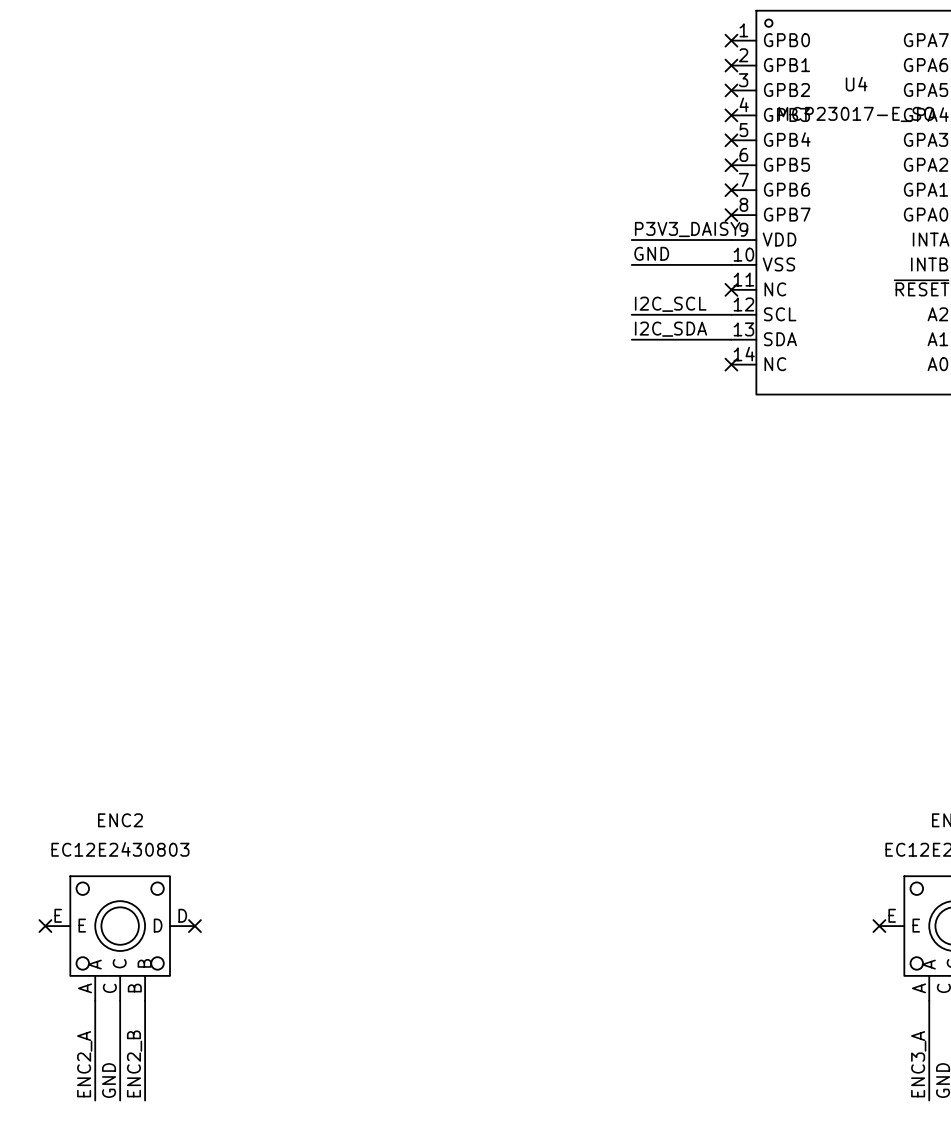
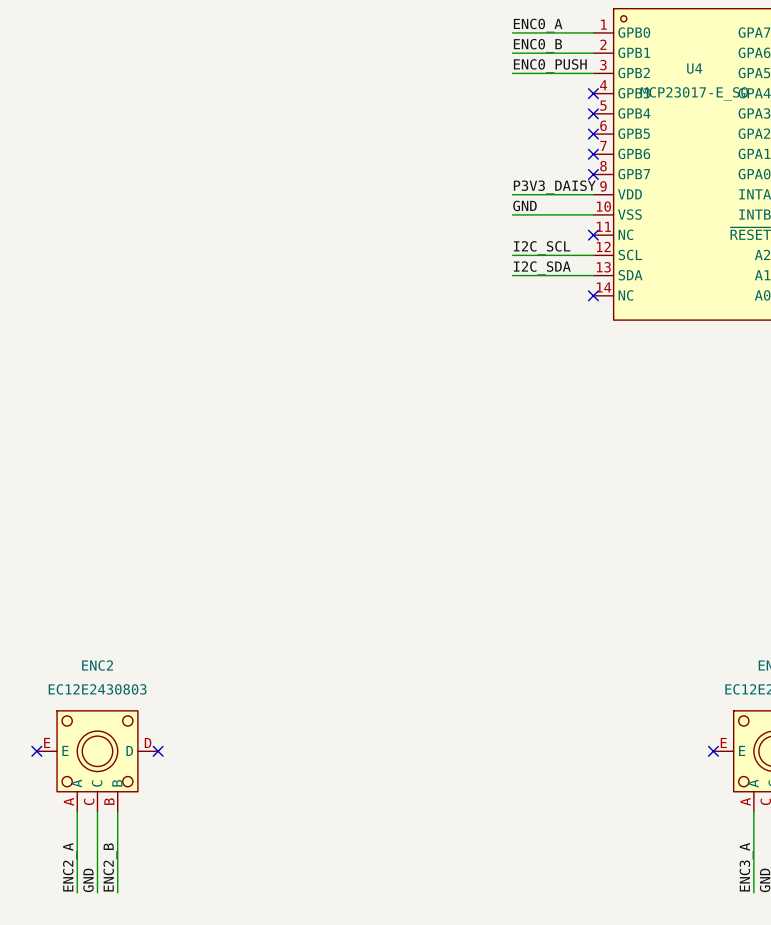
label: none -> ENC0_A (538, 25)
wire: none -> (512, 32) (593, 32)
no-connect mark: (731, 40) -> none
label: none -> ENC0_B (537, 45)
wire: none -> (512, 53) (593, 53)
no-connect mark: (731, 65) -> none
label: none -> ENC0_PUSH (550, 65)
wire: none -> (512, 73) (593, 73)
no-connect mark: (731, 90) -> none

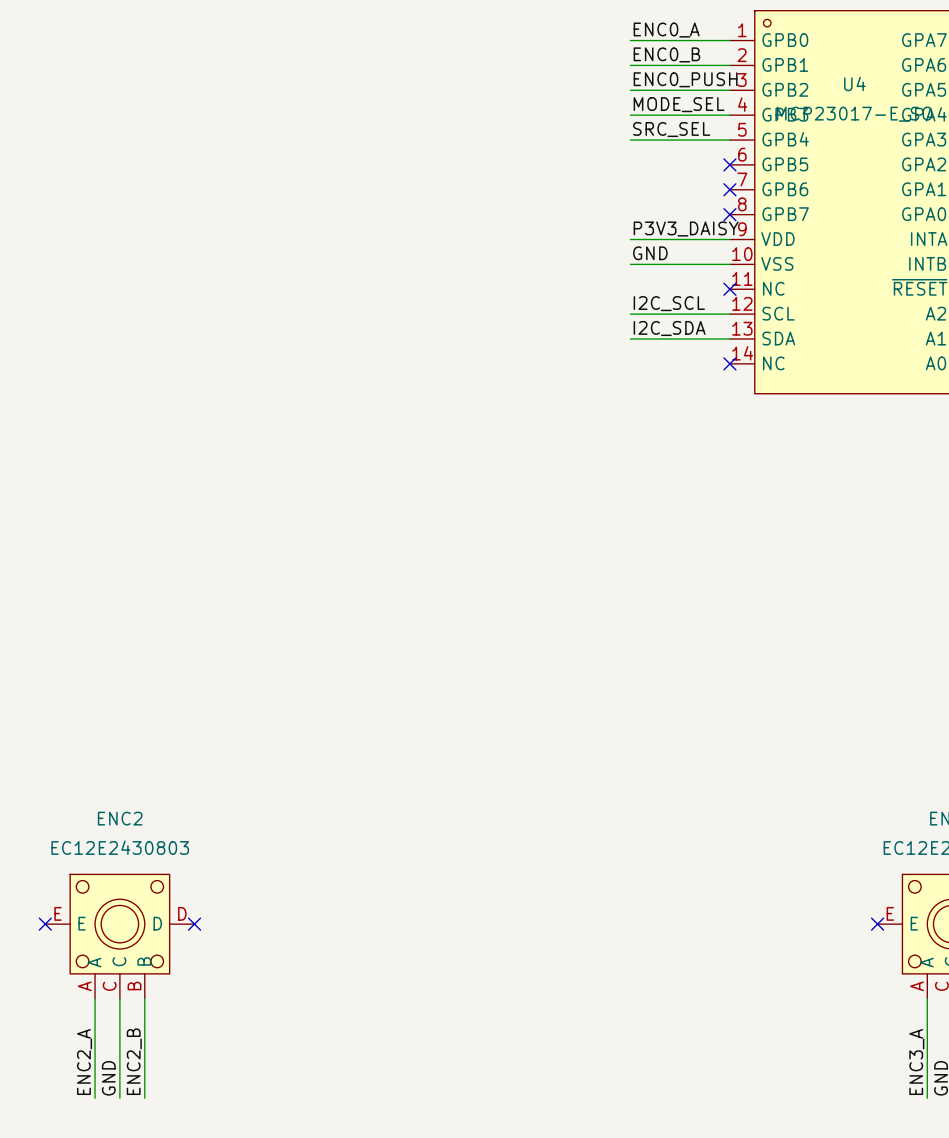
label: none -> MODE_SEL (679, 104)
wire: none -> (630, 115) (729, 115)
no-connect mark: (593, 93) -> none
label: none -> SRC_SEL (671, 129)
wire: none -> (630, 140) (729, 140)
no-connect mark: (593, 113) -> none

